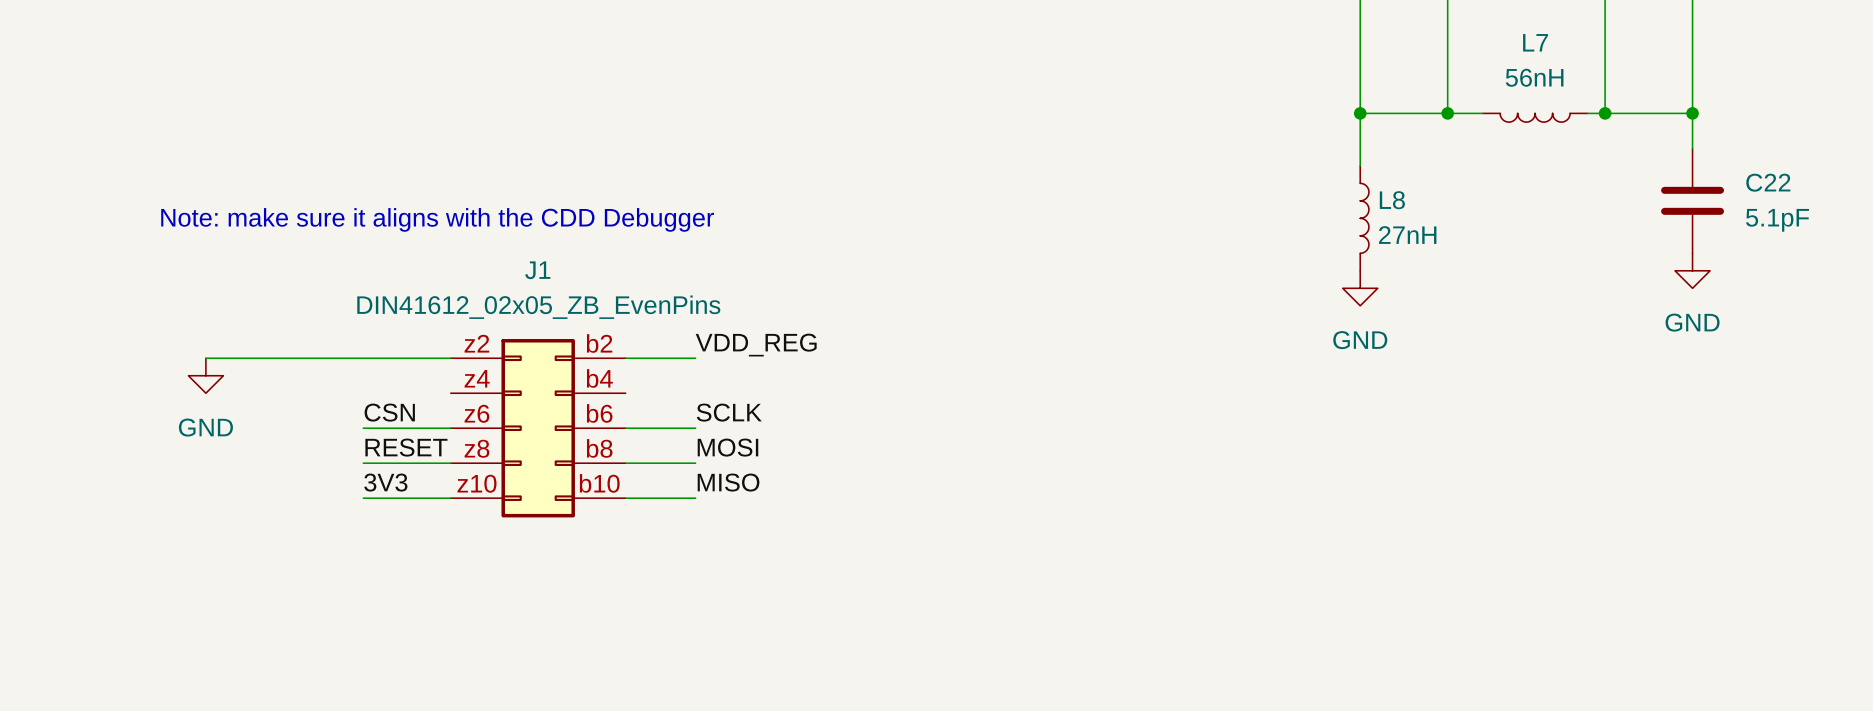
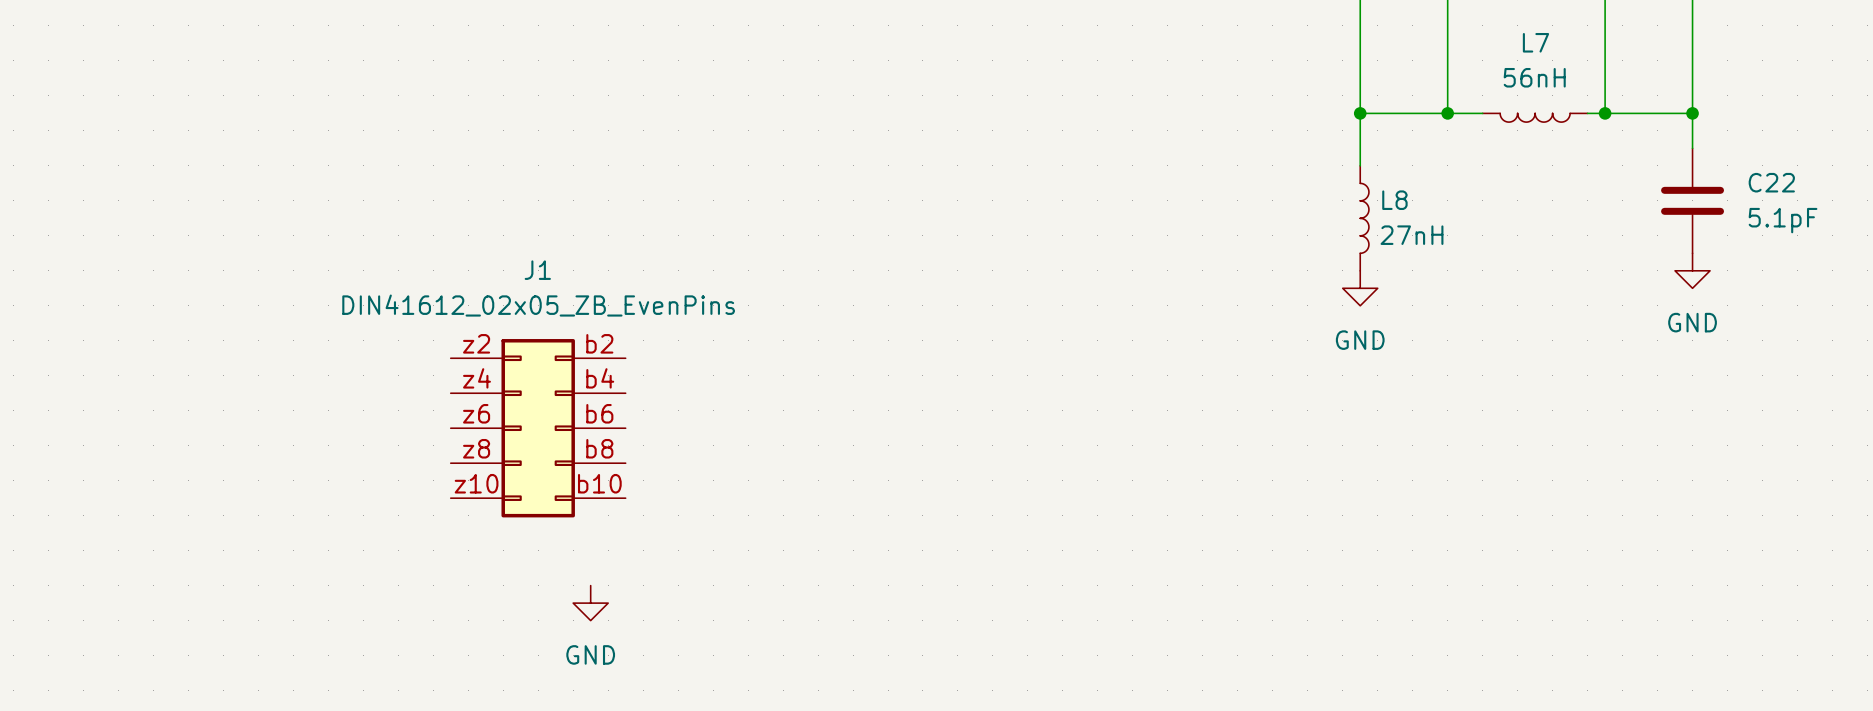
text: Note: make sure it aligns with the CDD Debugger (437, 219) -> none
label: VDD_REG (756, 345) -> none
wire: (205, 358) (450, 358) -> none
wire: (625, 358) (695, 358) -> none
power symbol: GND (205, 375) -> none
label: CSN (389, 412) -> none
label: SCLK (729, 412) -> none
wire: (363, 428) (450, 428) -> none
wire: (625, 428) (695, 428) -> none
label: RESET (406, 447) -> none
label: MOSI (727, 447) -> none
wire: (363, 463) (450, 463) -> none
wire: (625, 463) (695, 463) -> none
label: 3V3 (385, 482) -> none
label: MISO (728, 482) -> none
wire: (363, 498) (450, 498) -> none
wire: (625, 498) (695, 498) -> none
power symbol: none -> GND (590, 603)

